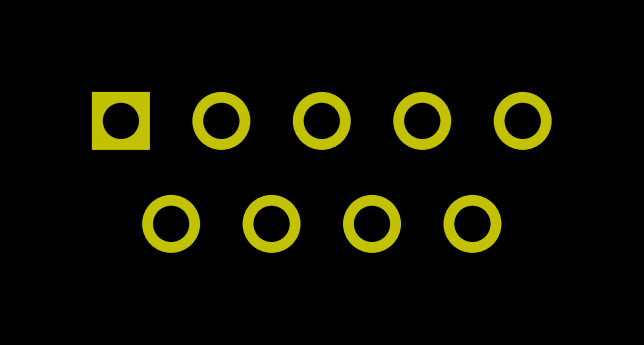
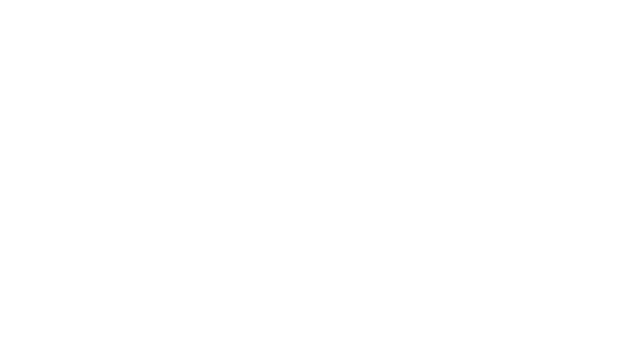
part: (321, 172) -> none

